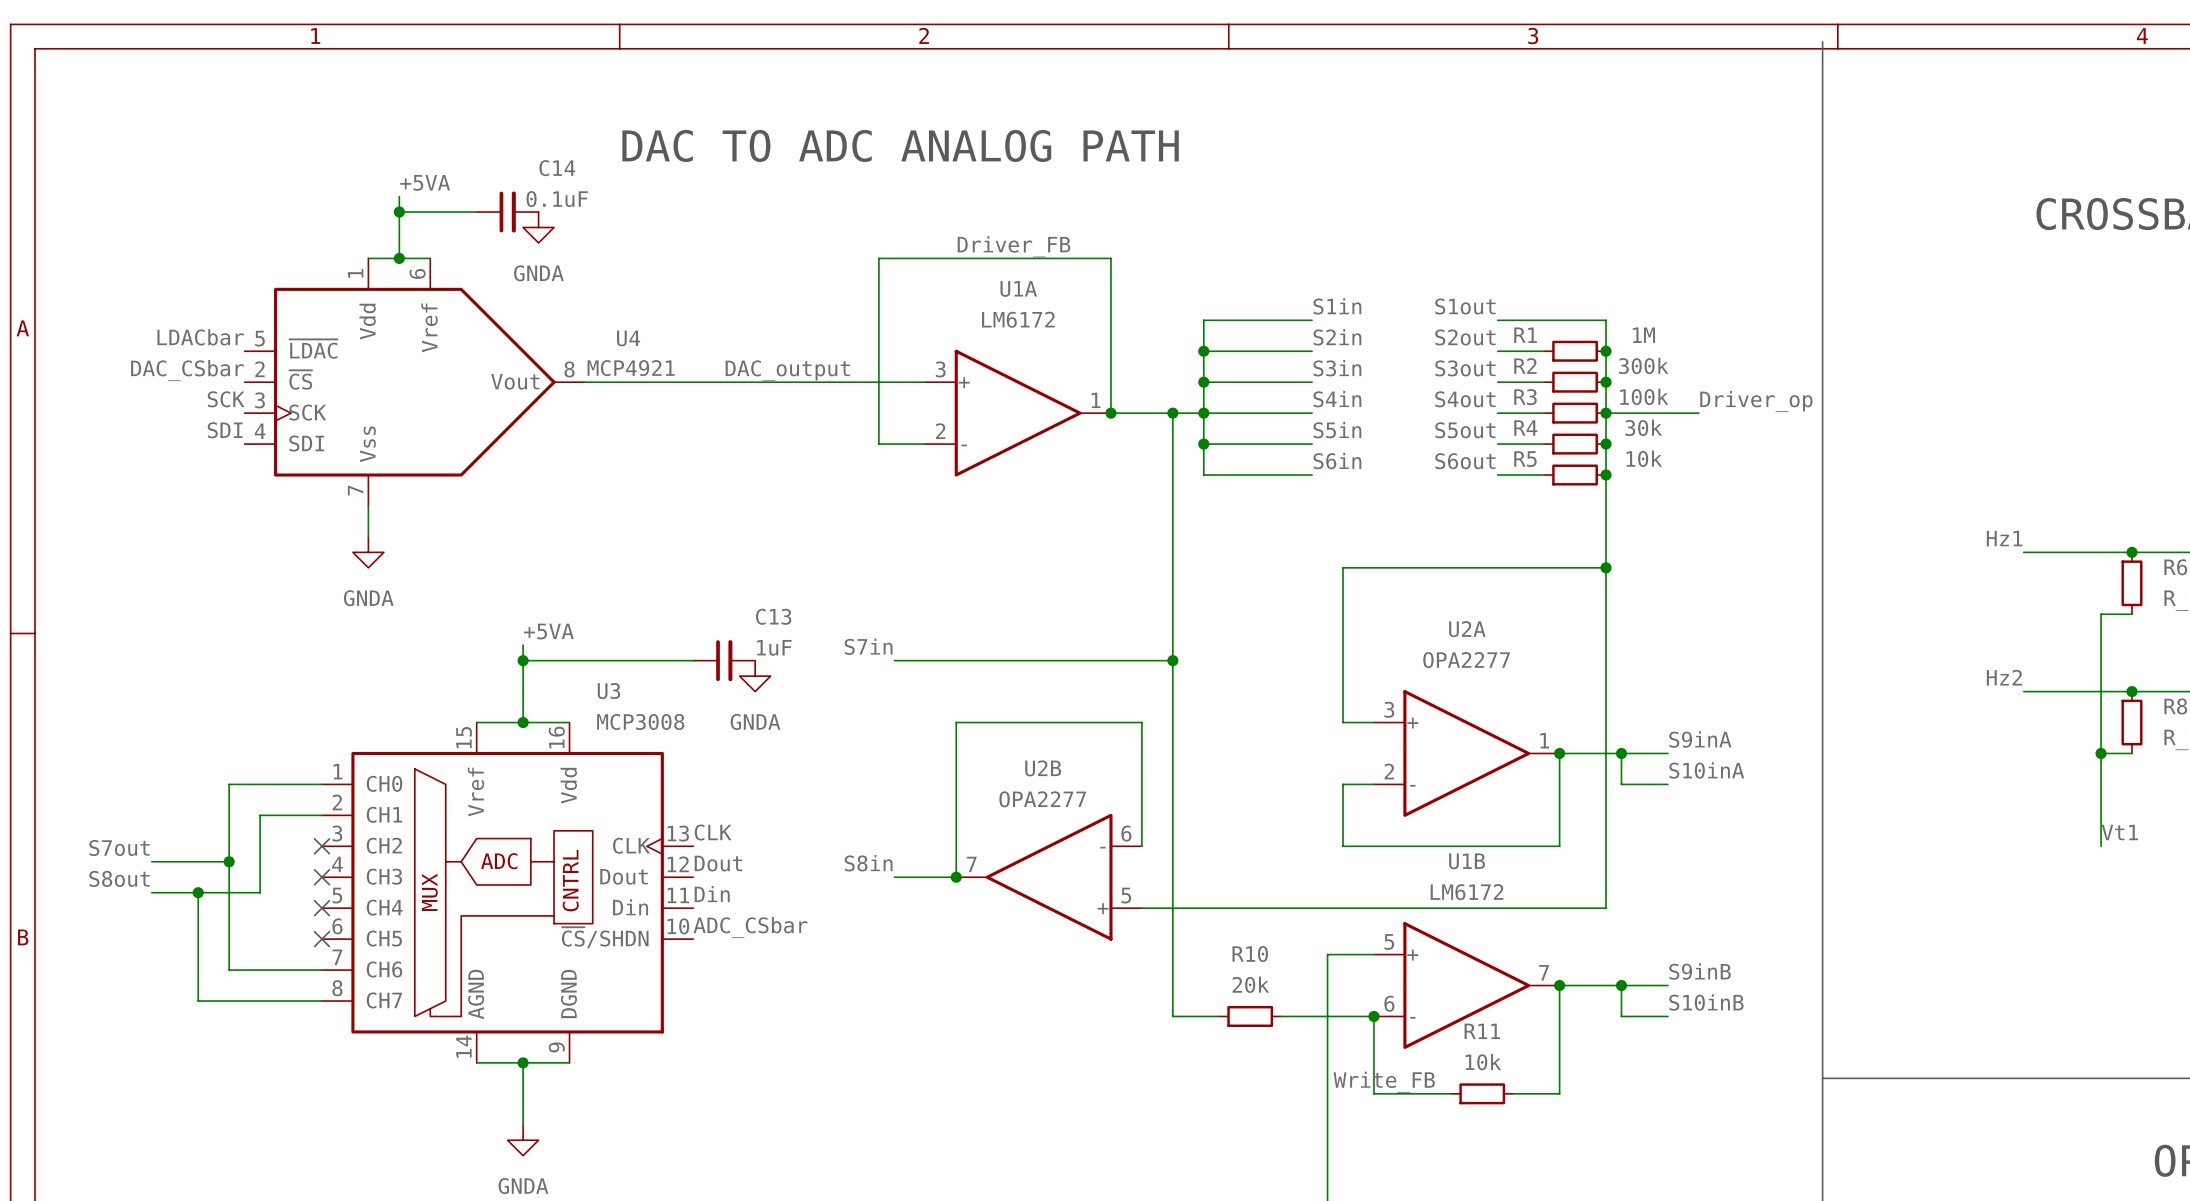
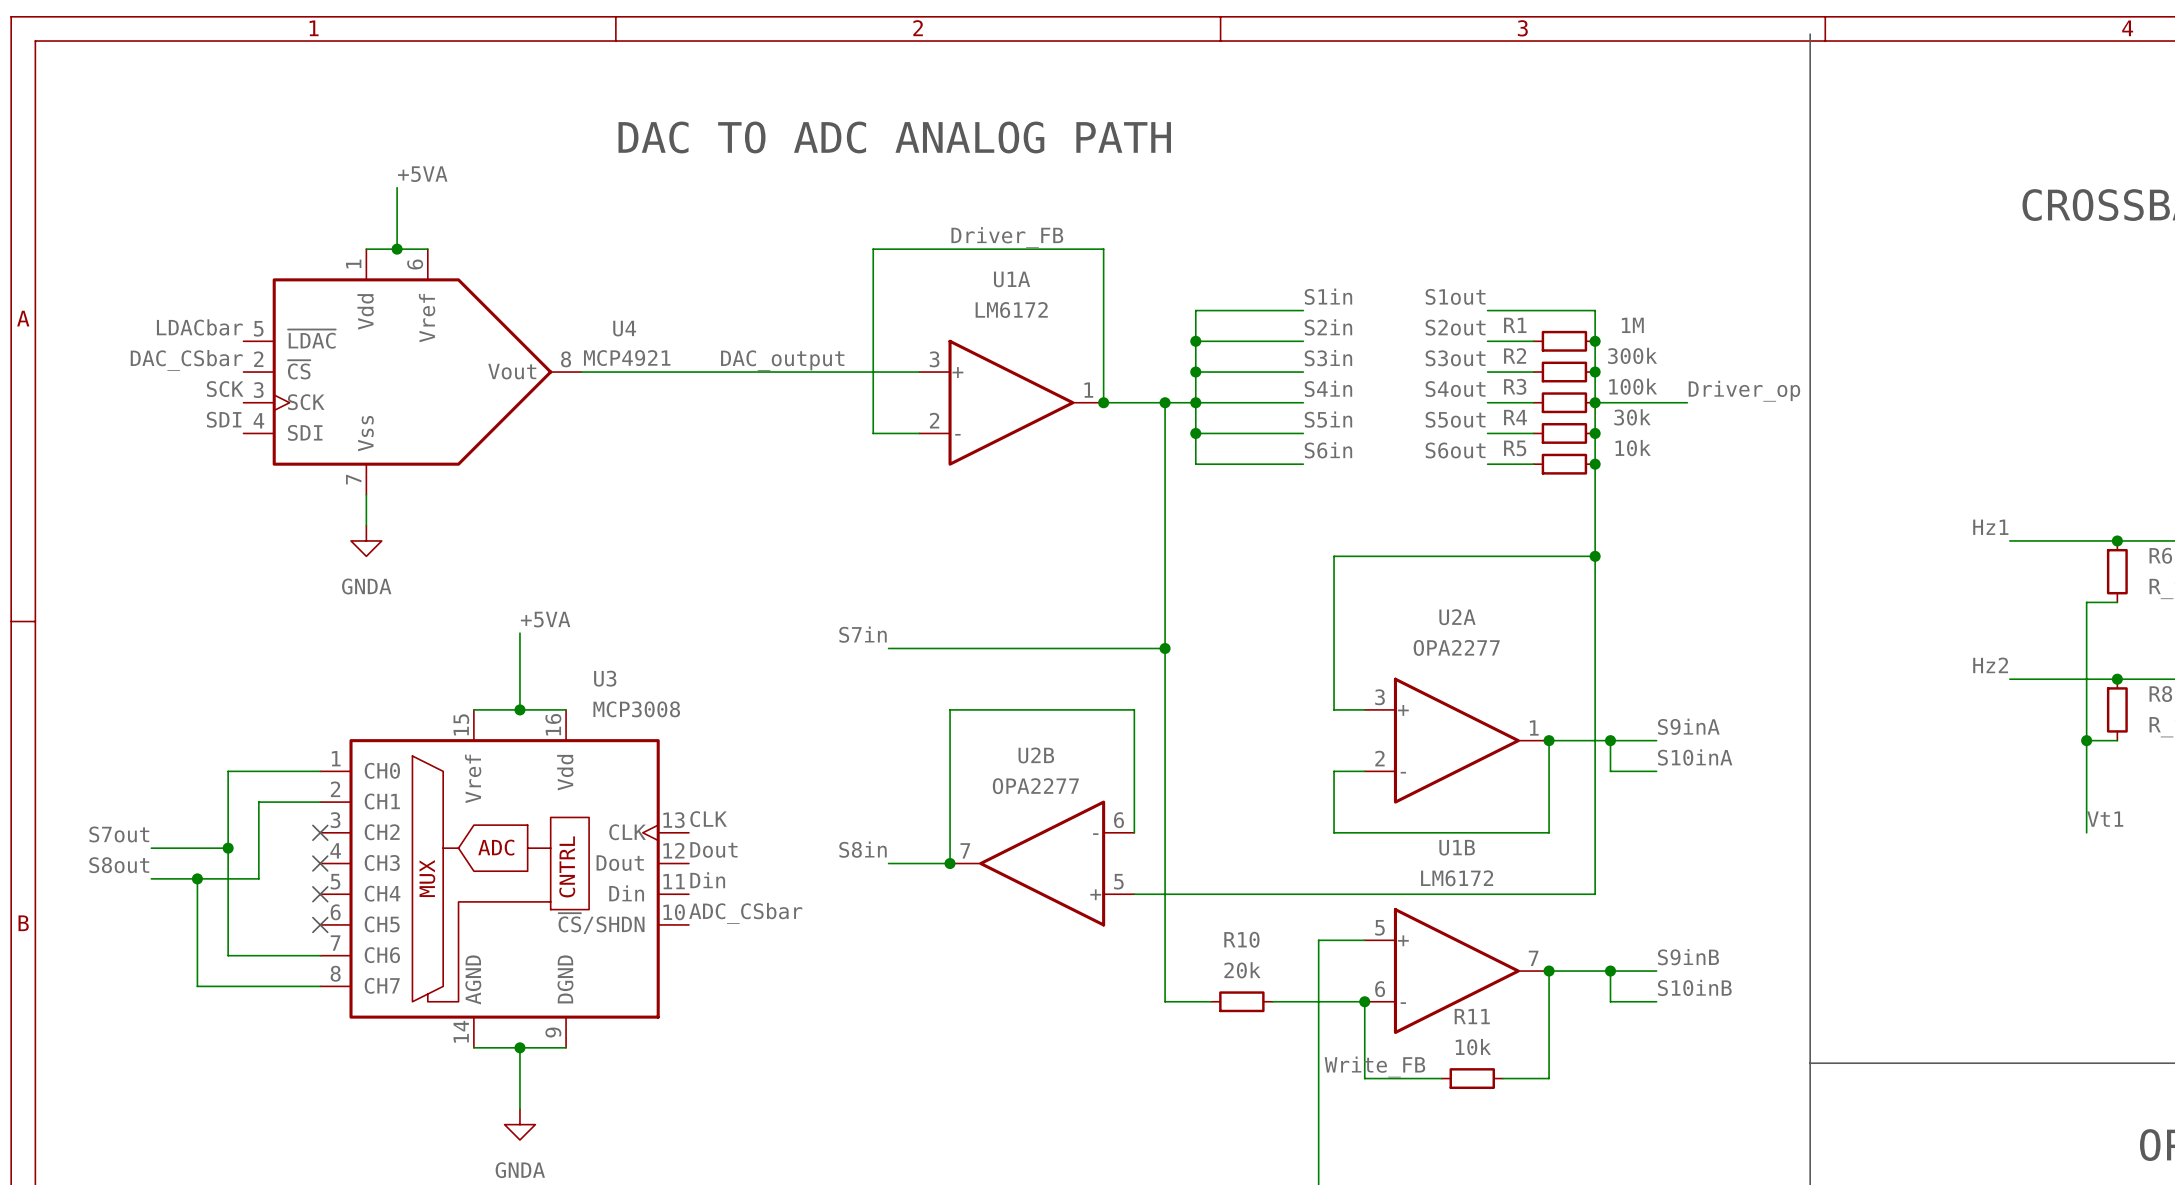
wire: (399, 212) (476, 212) -> none
junction: (399, 212) -> none
C14: 0.1uF (507, 212) -> none
power symbol: GNDA (538, 227) -> none
wire: (523, 660) (693, 660) -> none
junction: (523, 660) -> none
C13: 1uF (724, 660) -> none
power symbol: GNDA (755, 676) -> none

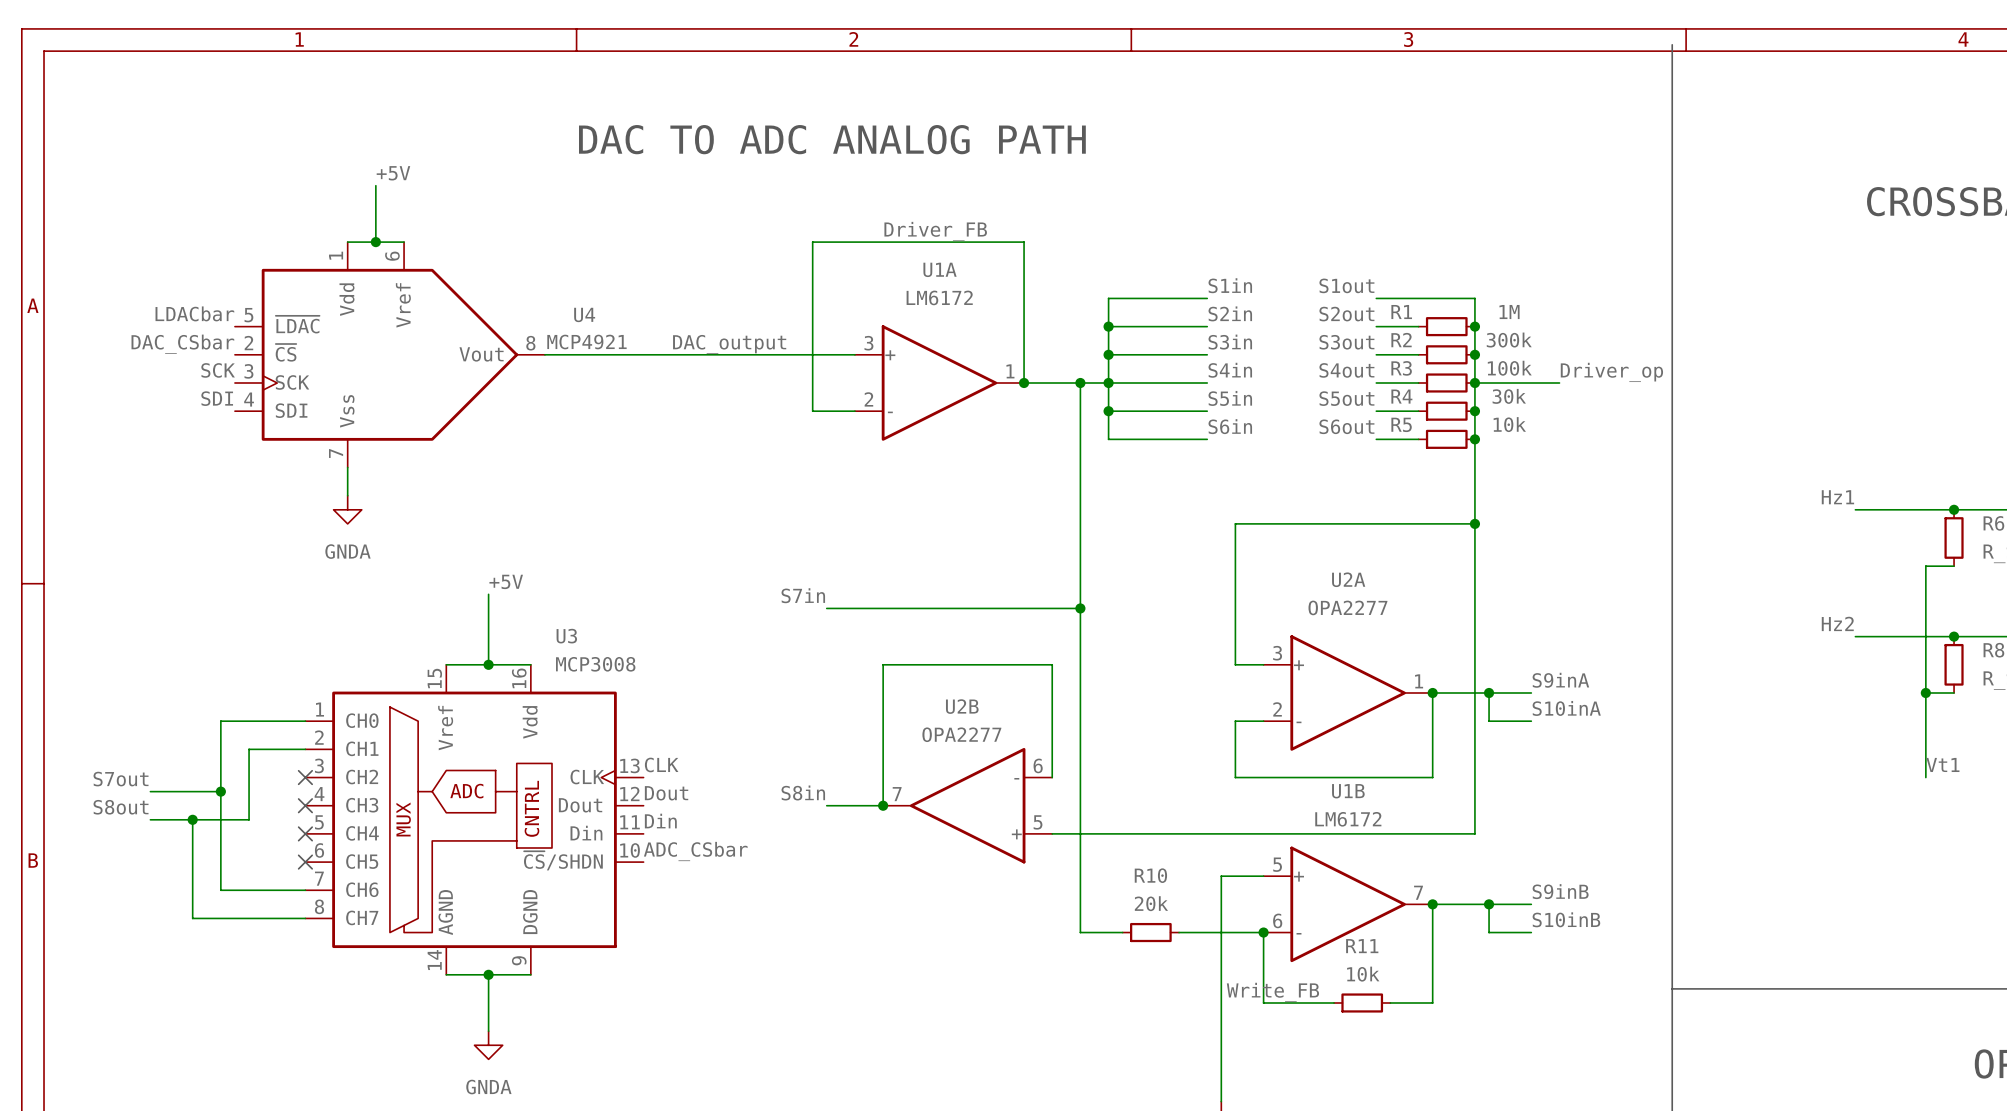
label: +5VA (422, 174) -> +5V (393, 173)
label: +5VA (545, 619) -> +5V (506, 581)

